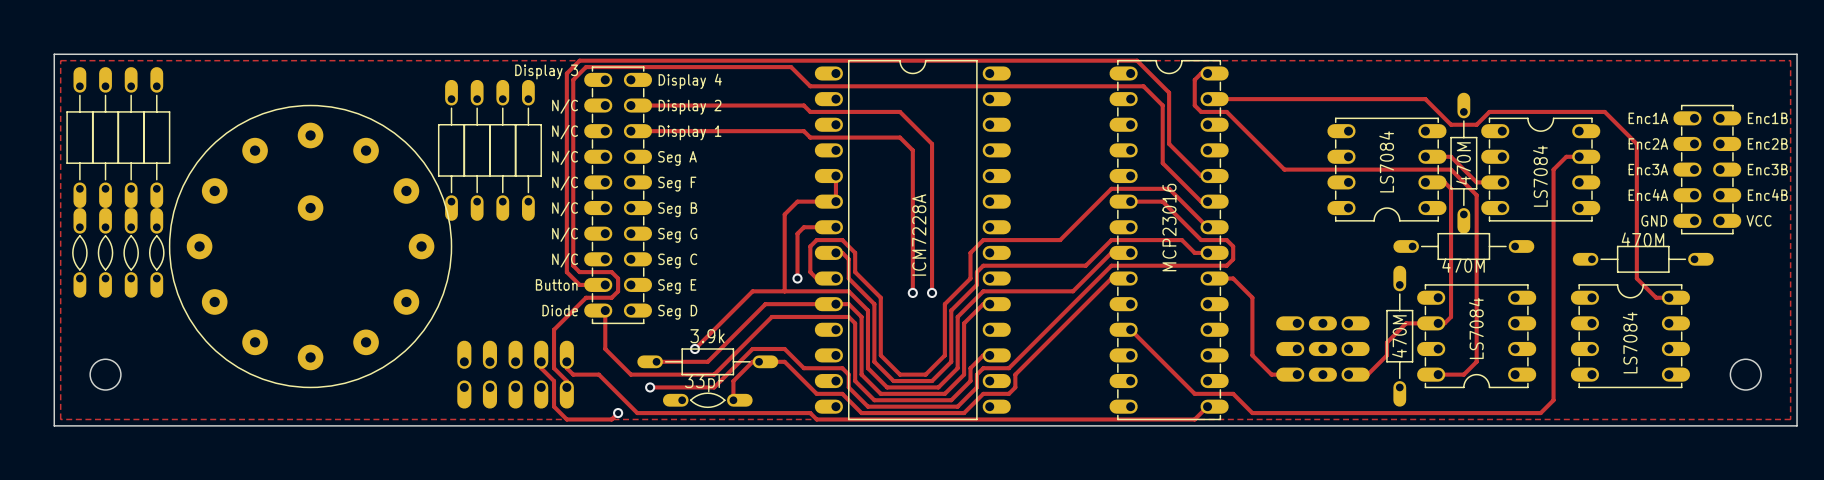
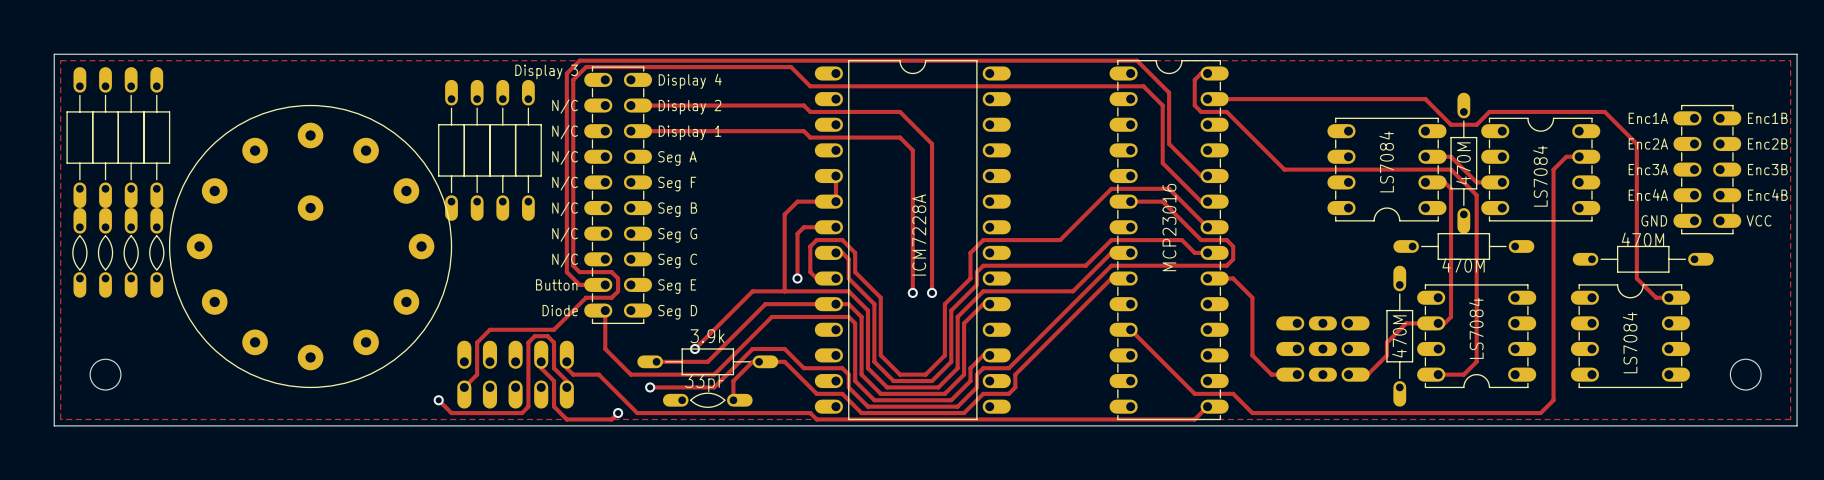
track: (554, 329) (554, 342) -> (554, 329) (489, 329) (477, 342) (477, 374) (464, 387)
track: none -> (554, 342) (547, 336) (534, 336) (528, 342) (528, 406) (521, 413) (451, 413) (438, 400)
via: none -> (438, 400)

